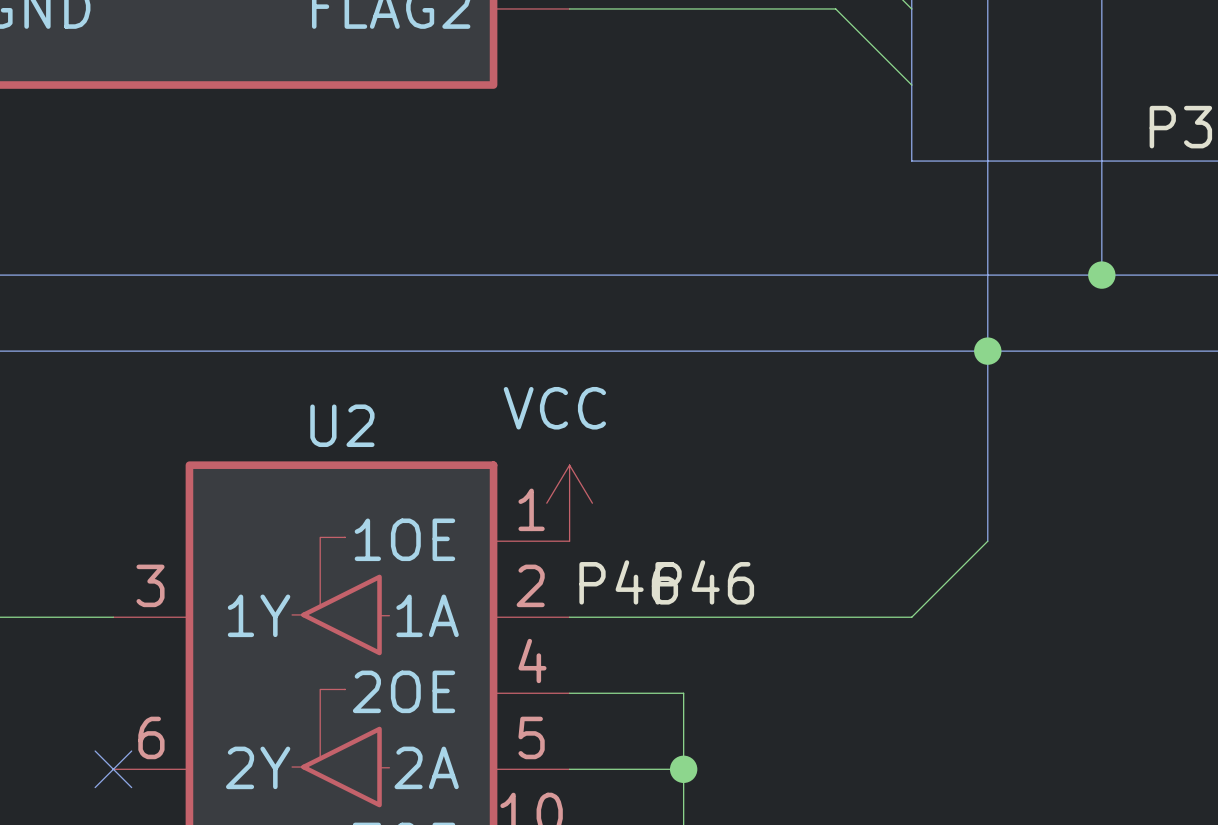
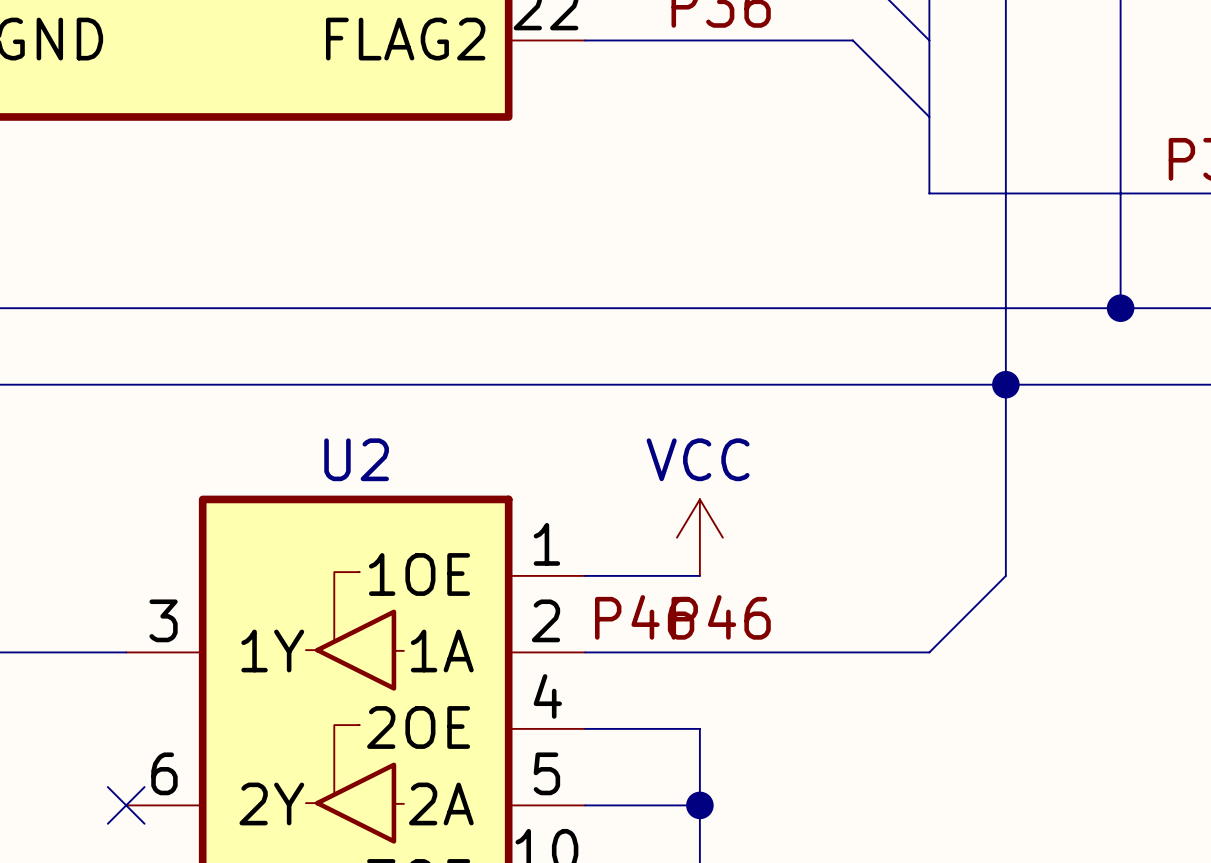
power symbol text position: VCC (554, 408) -> VCC (698, 459)
power symbol position: VCC (569, 503) -> VCC (699, 537)
wire: none -> (585, 575) (699, 575)

